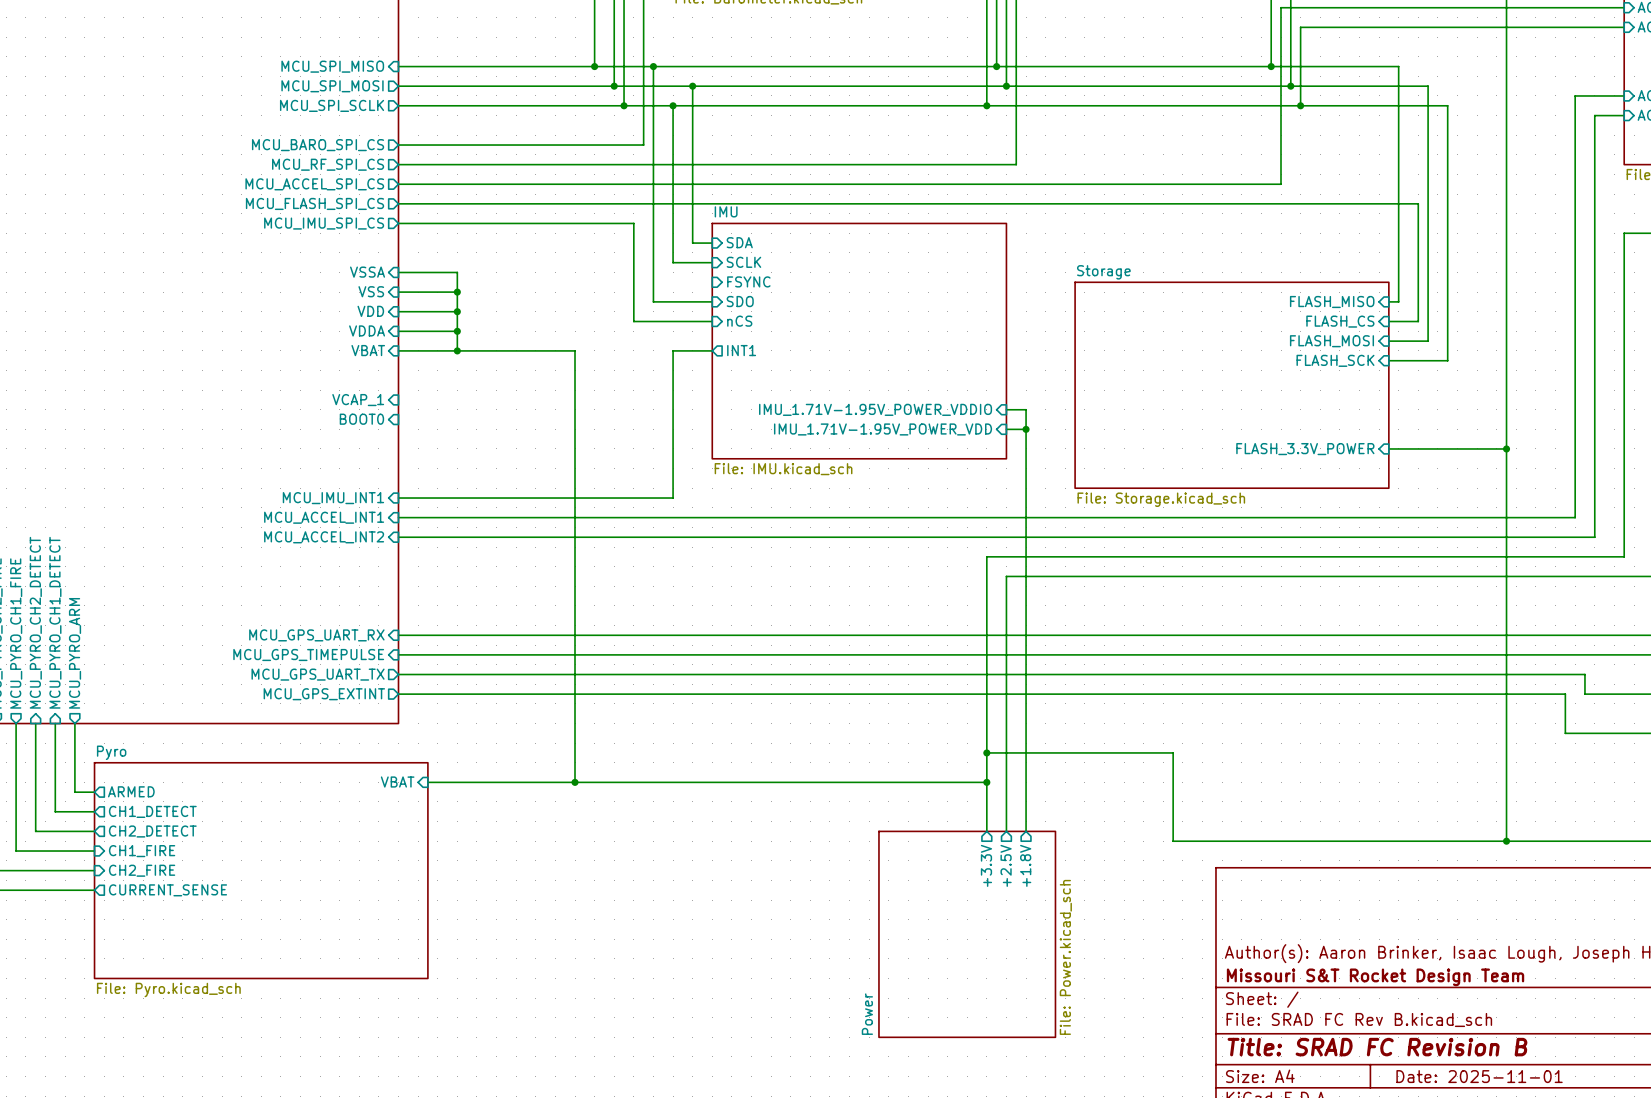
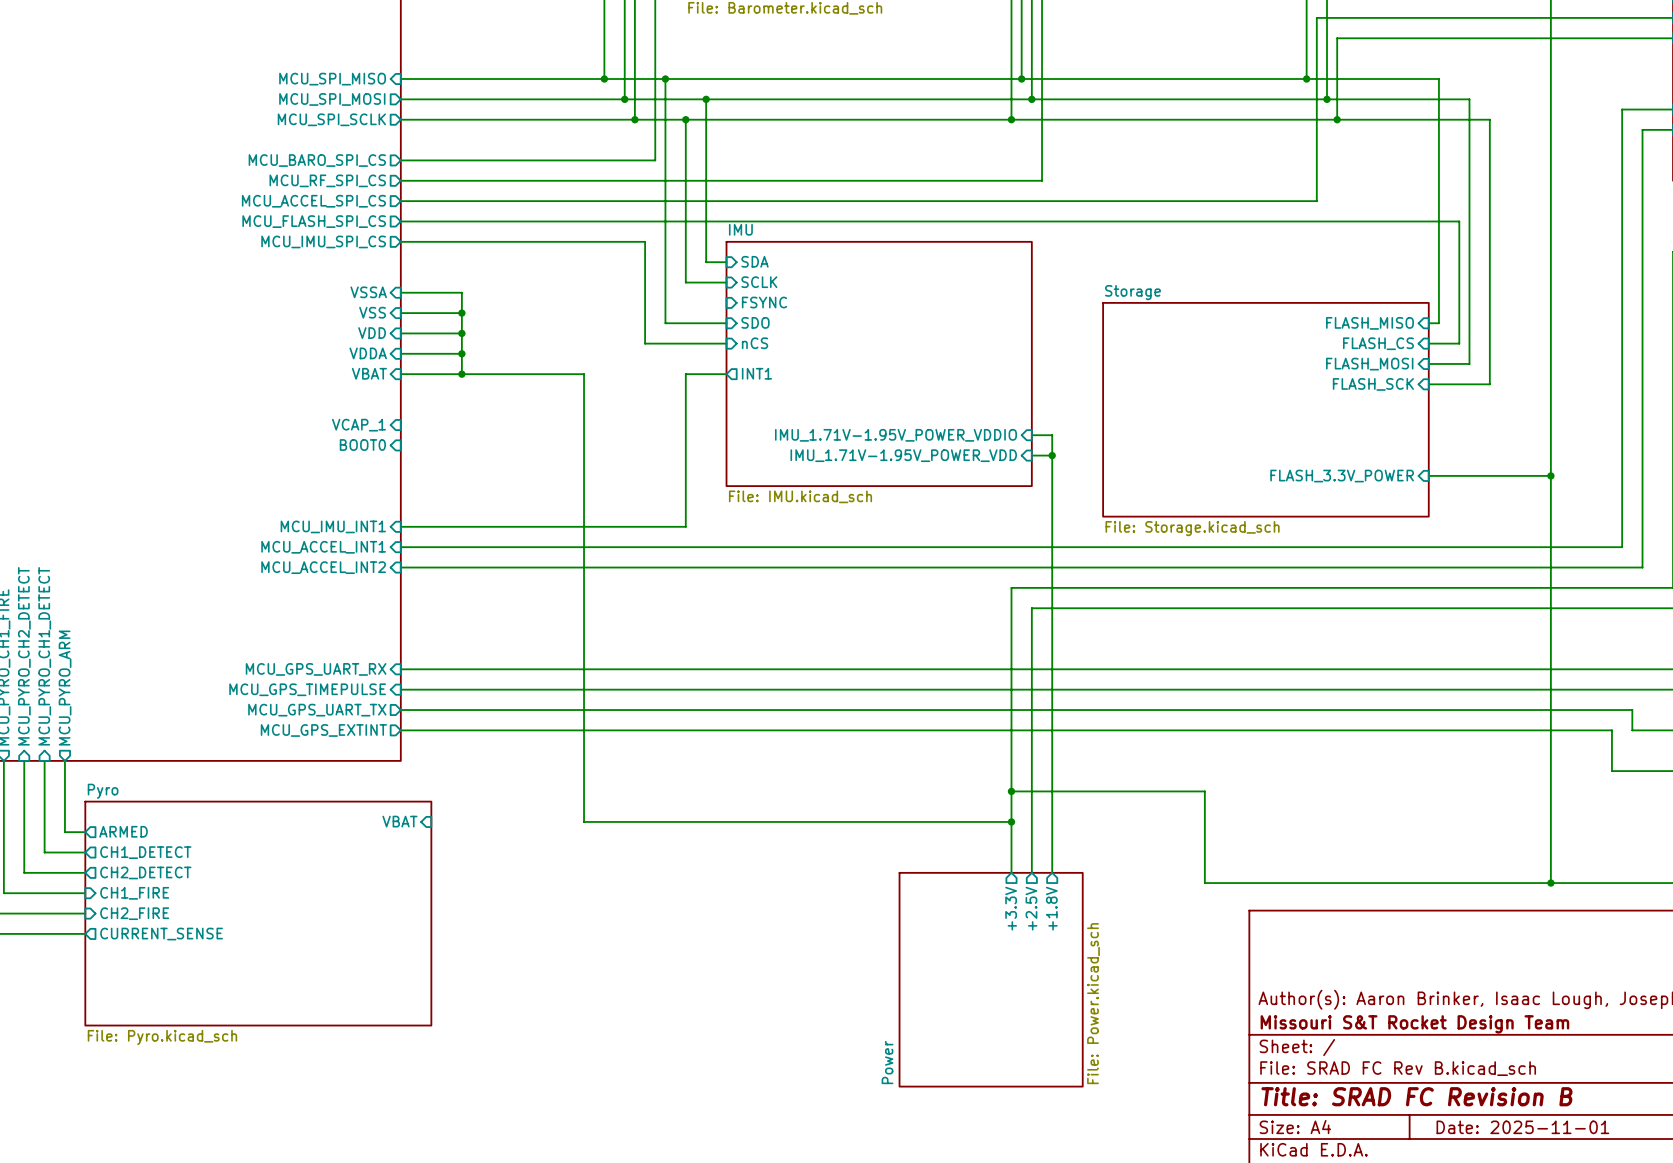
wire: (427, 782) (575, 782) -> none
junction: (575, 782) -> none

